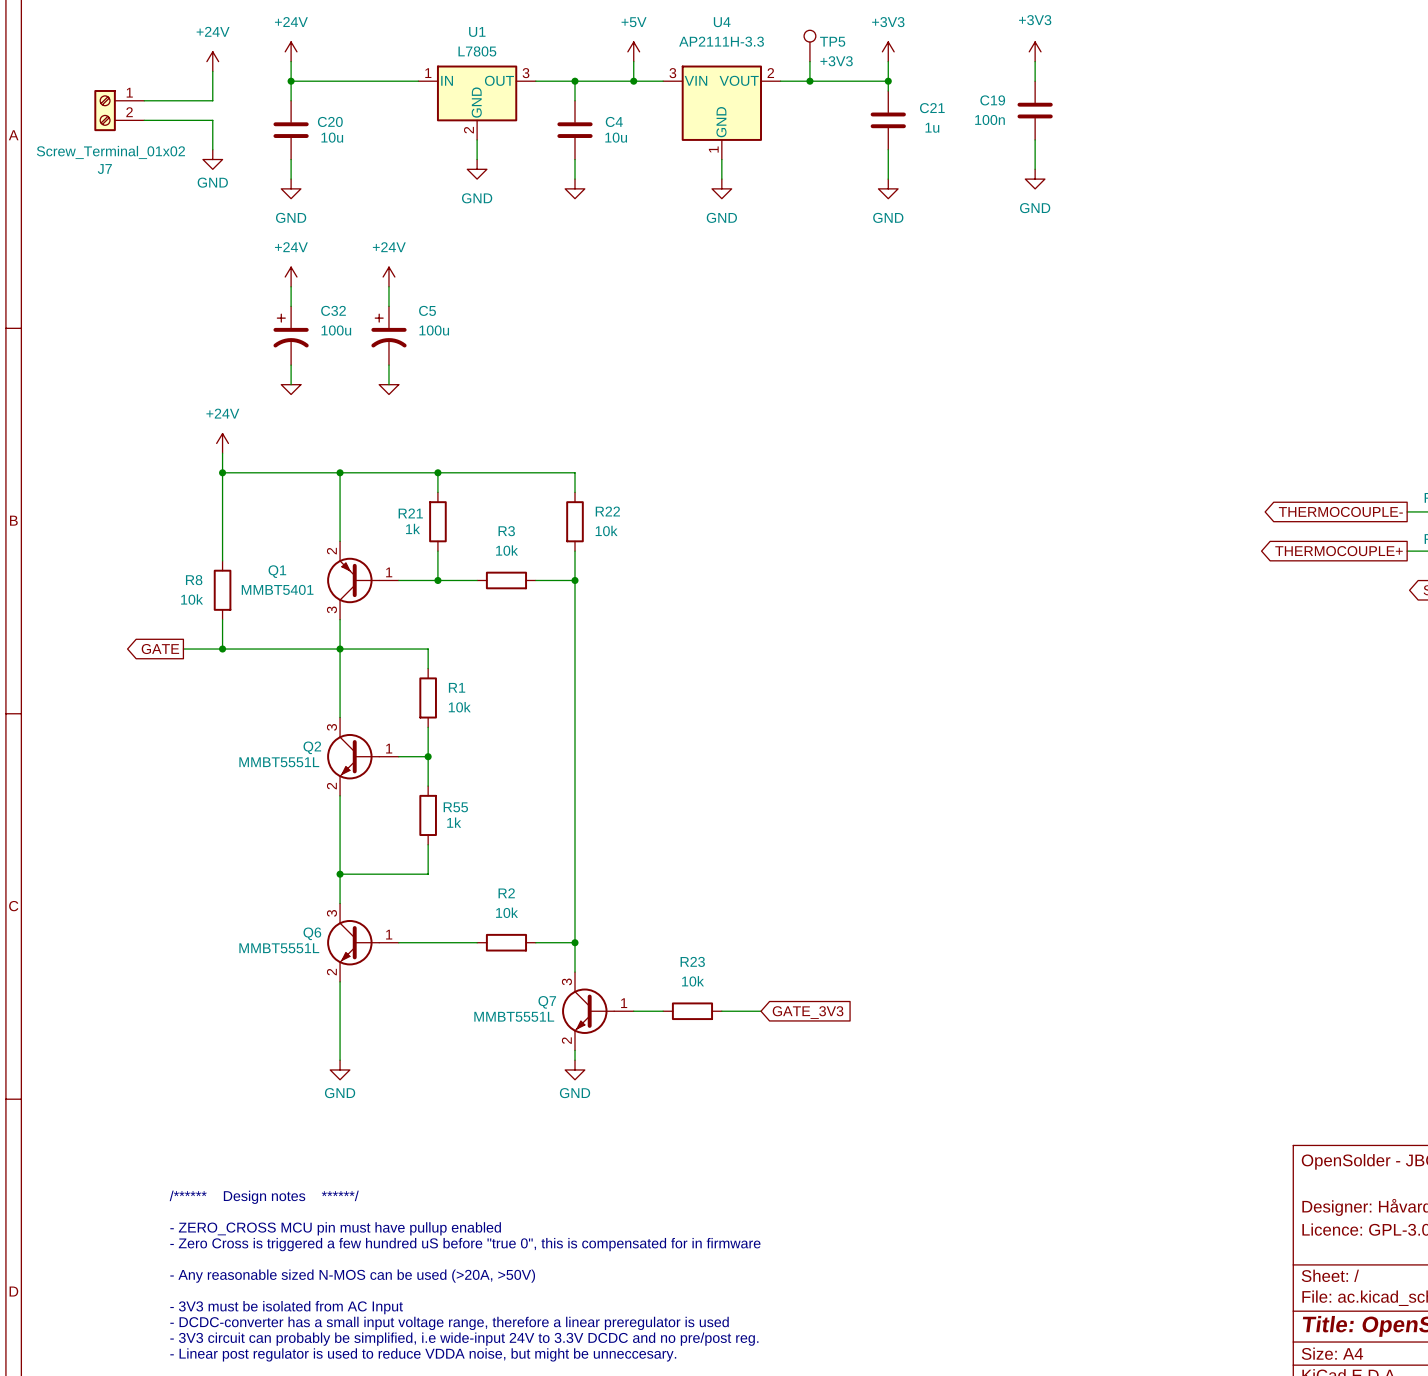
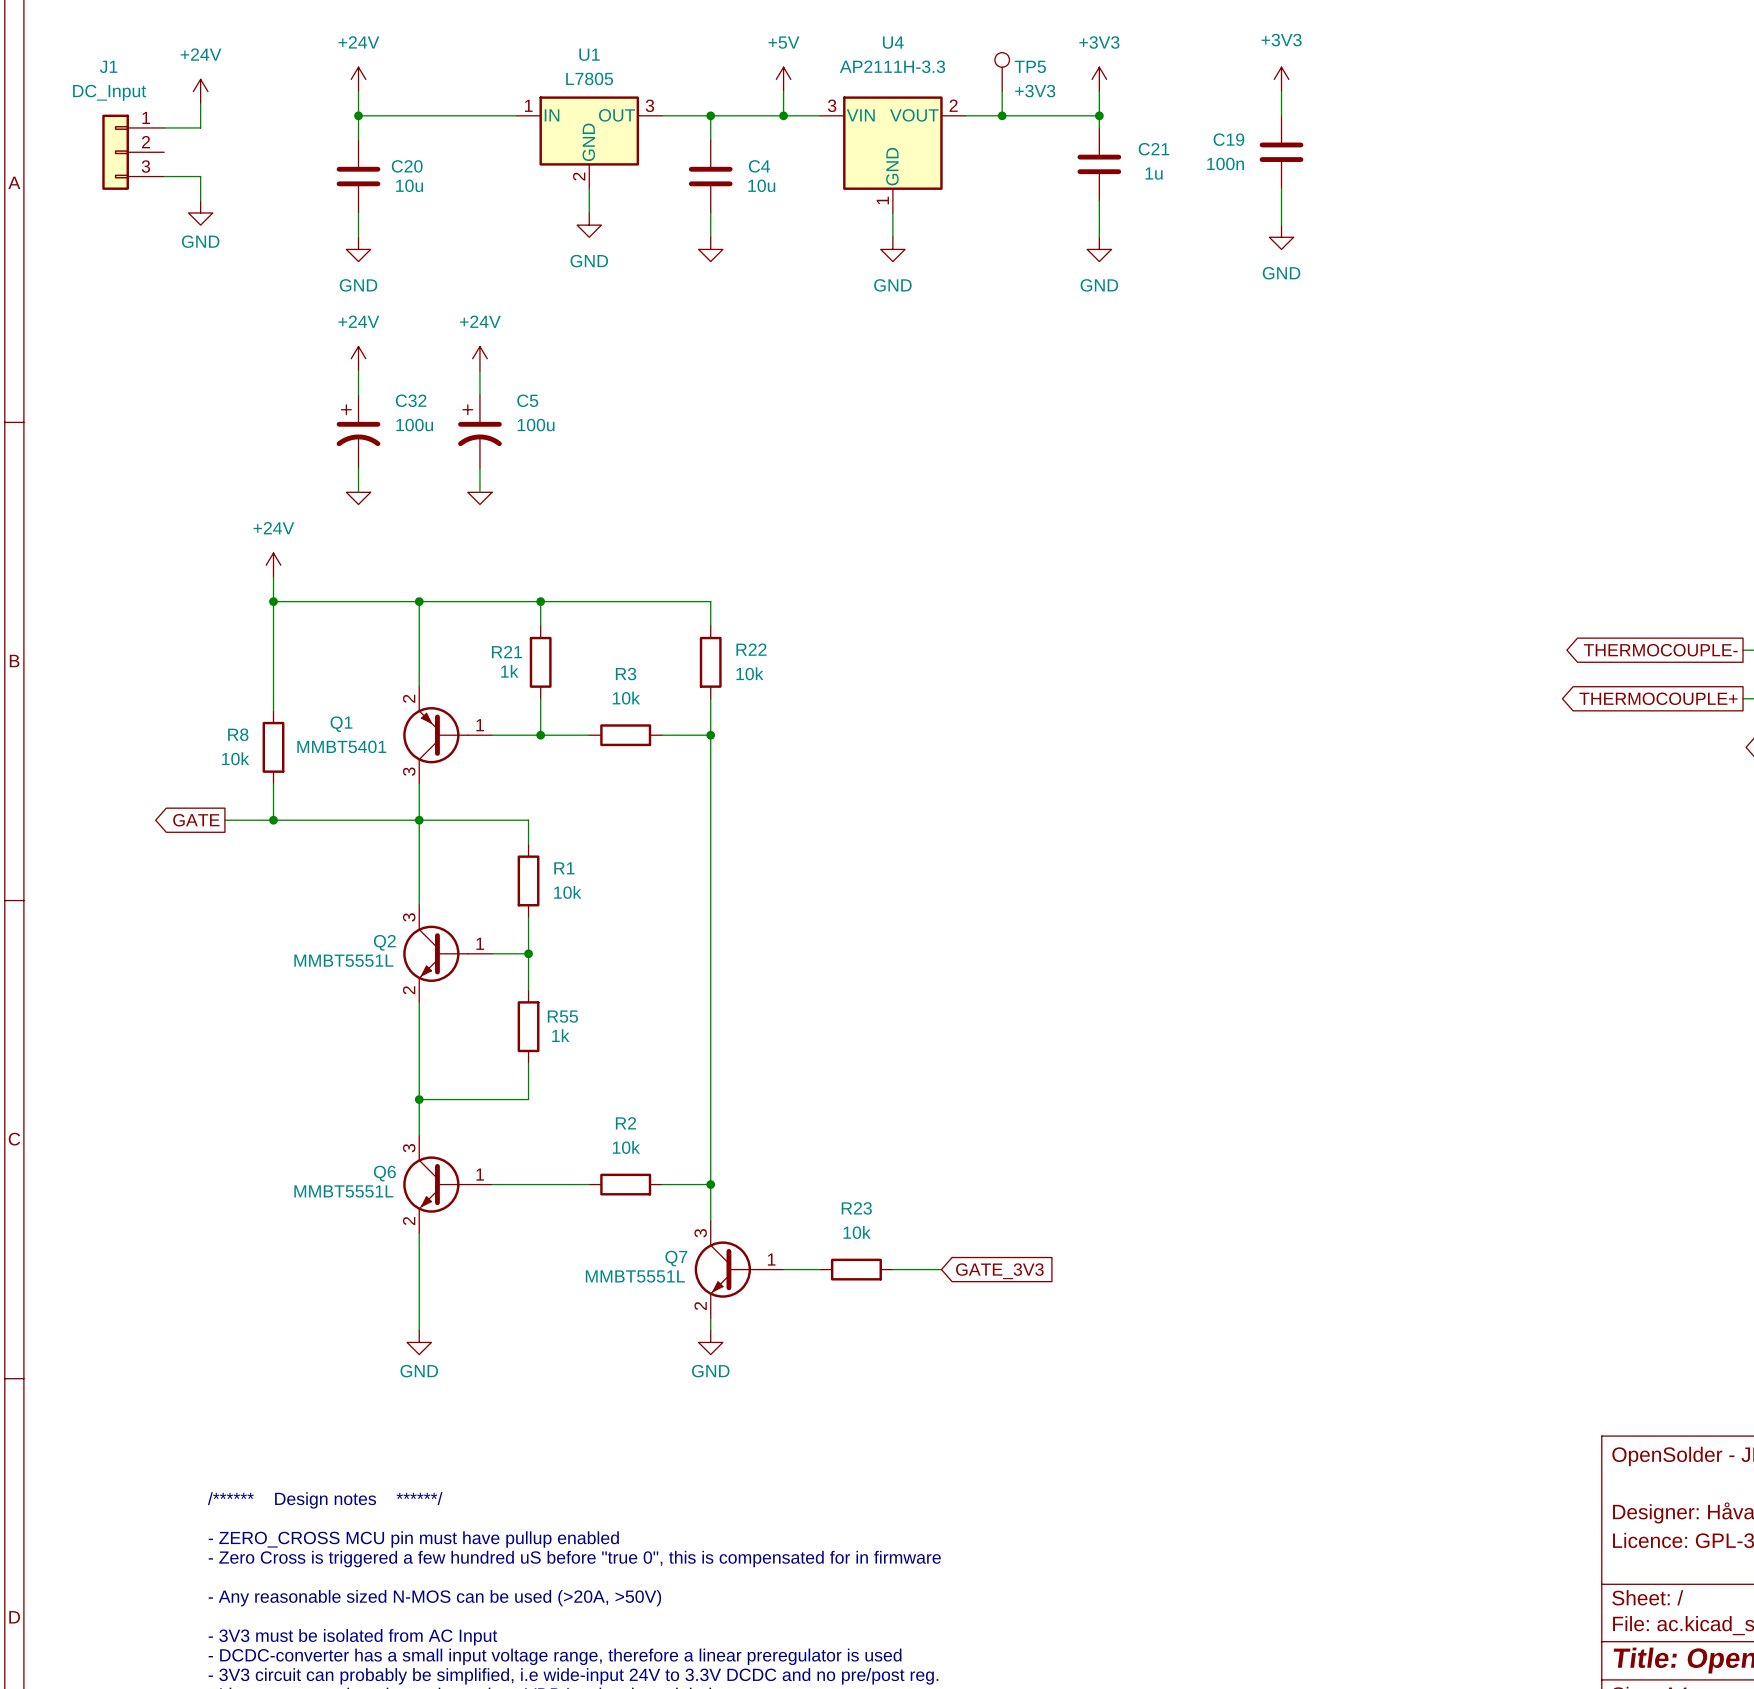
power symbol position: +24V (212, 61) -> +24V (200, 91)
wire: none -> (200, 103) (200, 127) (164, 127)
wire: (212, 71) (212, 100) (144, 100) -> none
J1: none -> DC_Input (133, 152)
J7: Screw_Terminal_01x02 (119, 110) -> none
wire: (144, 120) (212, 120) (212, 149) -> none
wire: none -> (164, 176) (200, 176) (200, 200)
power symbol position: GND (212, 159) -> GND (200, 212)

